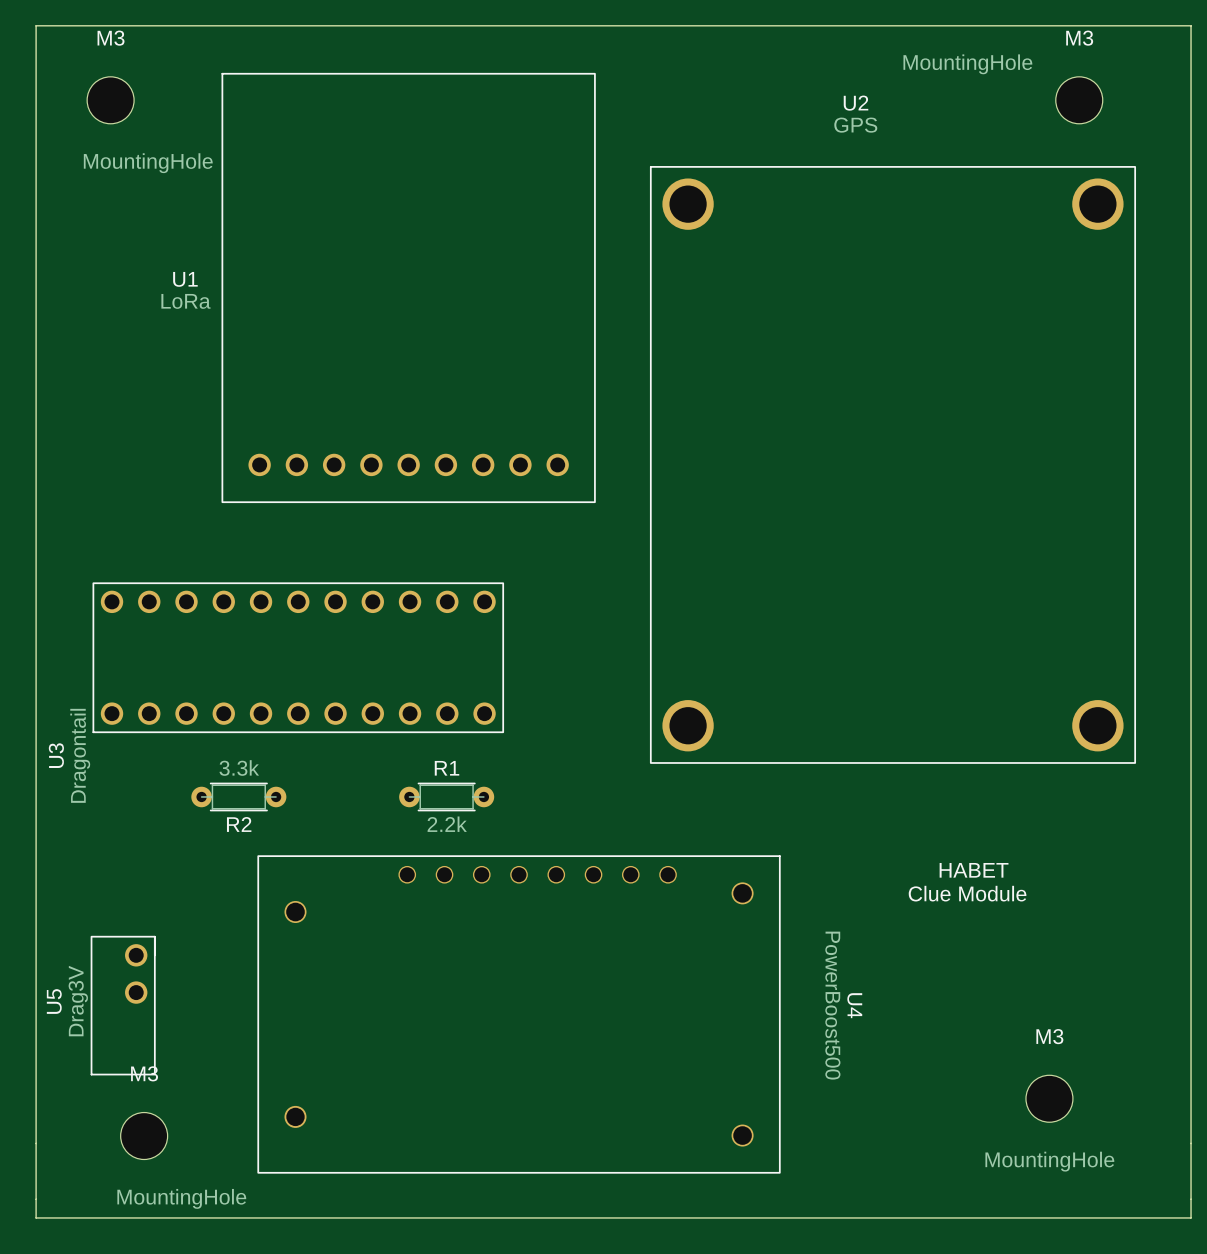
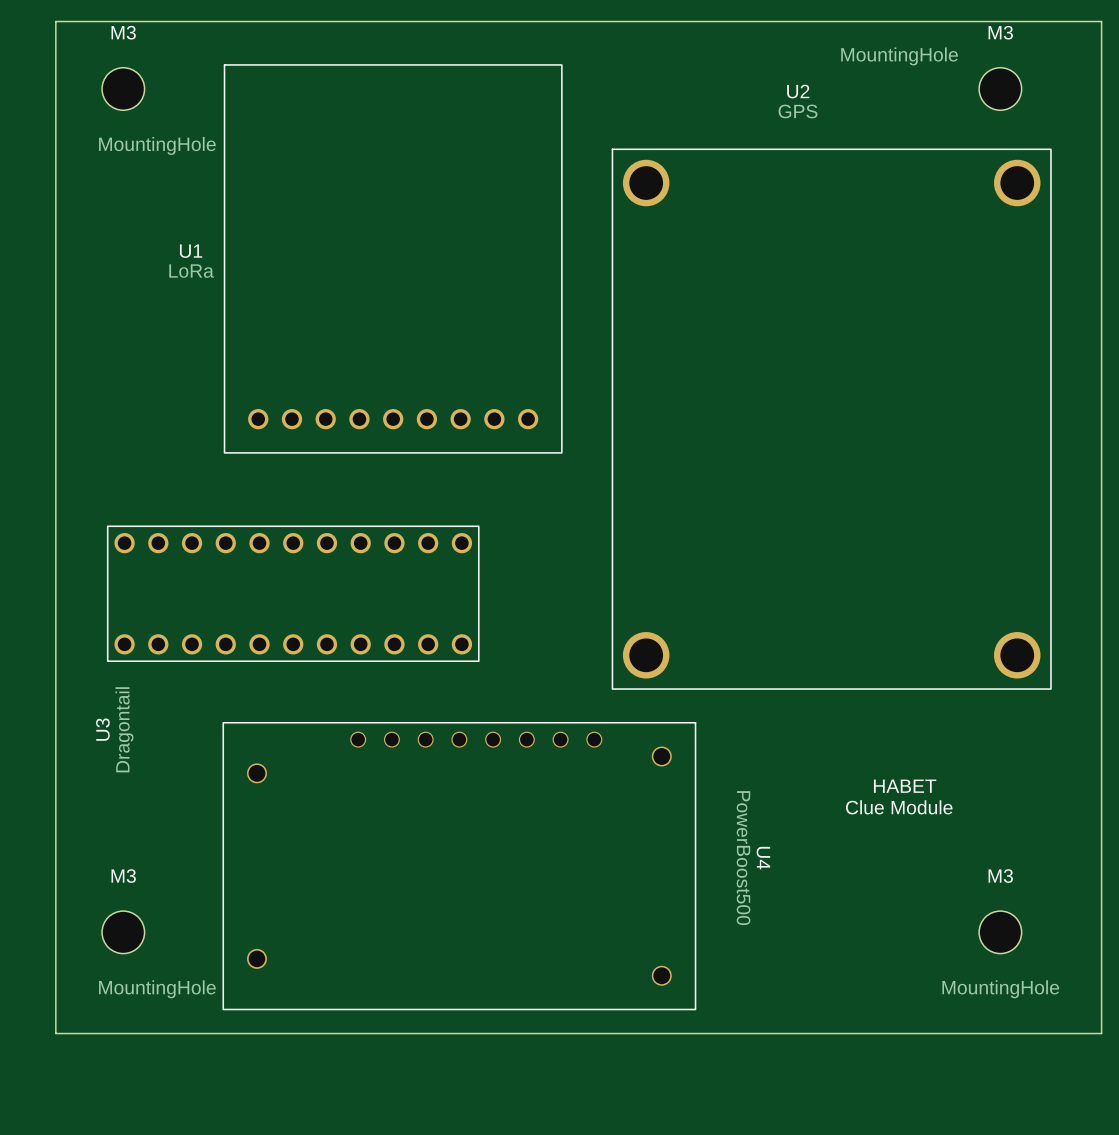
U3 name position: U3 (56, 755) -> U3 (102, 729)
U3 value position: Dragontail (80, 755) -> Dragontail (124, 729)
R2: 3.3k (238, 796) -> none
R1: 2.2k (446, 796) -> none
U5: Drag3V (123, 1005) -> none
U4 position: (519, 1014) -> (459, 866)
M3 position: (1049, 1098) -> (1000, 932)
M3 position: (144, 1136) -> (123, 932)
board edge: (36, 1143) (36, 1217) (1191, 1217) (1191, 1143) -> (55, 1033) (1101, 1033)

